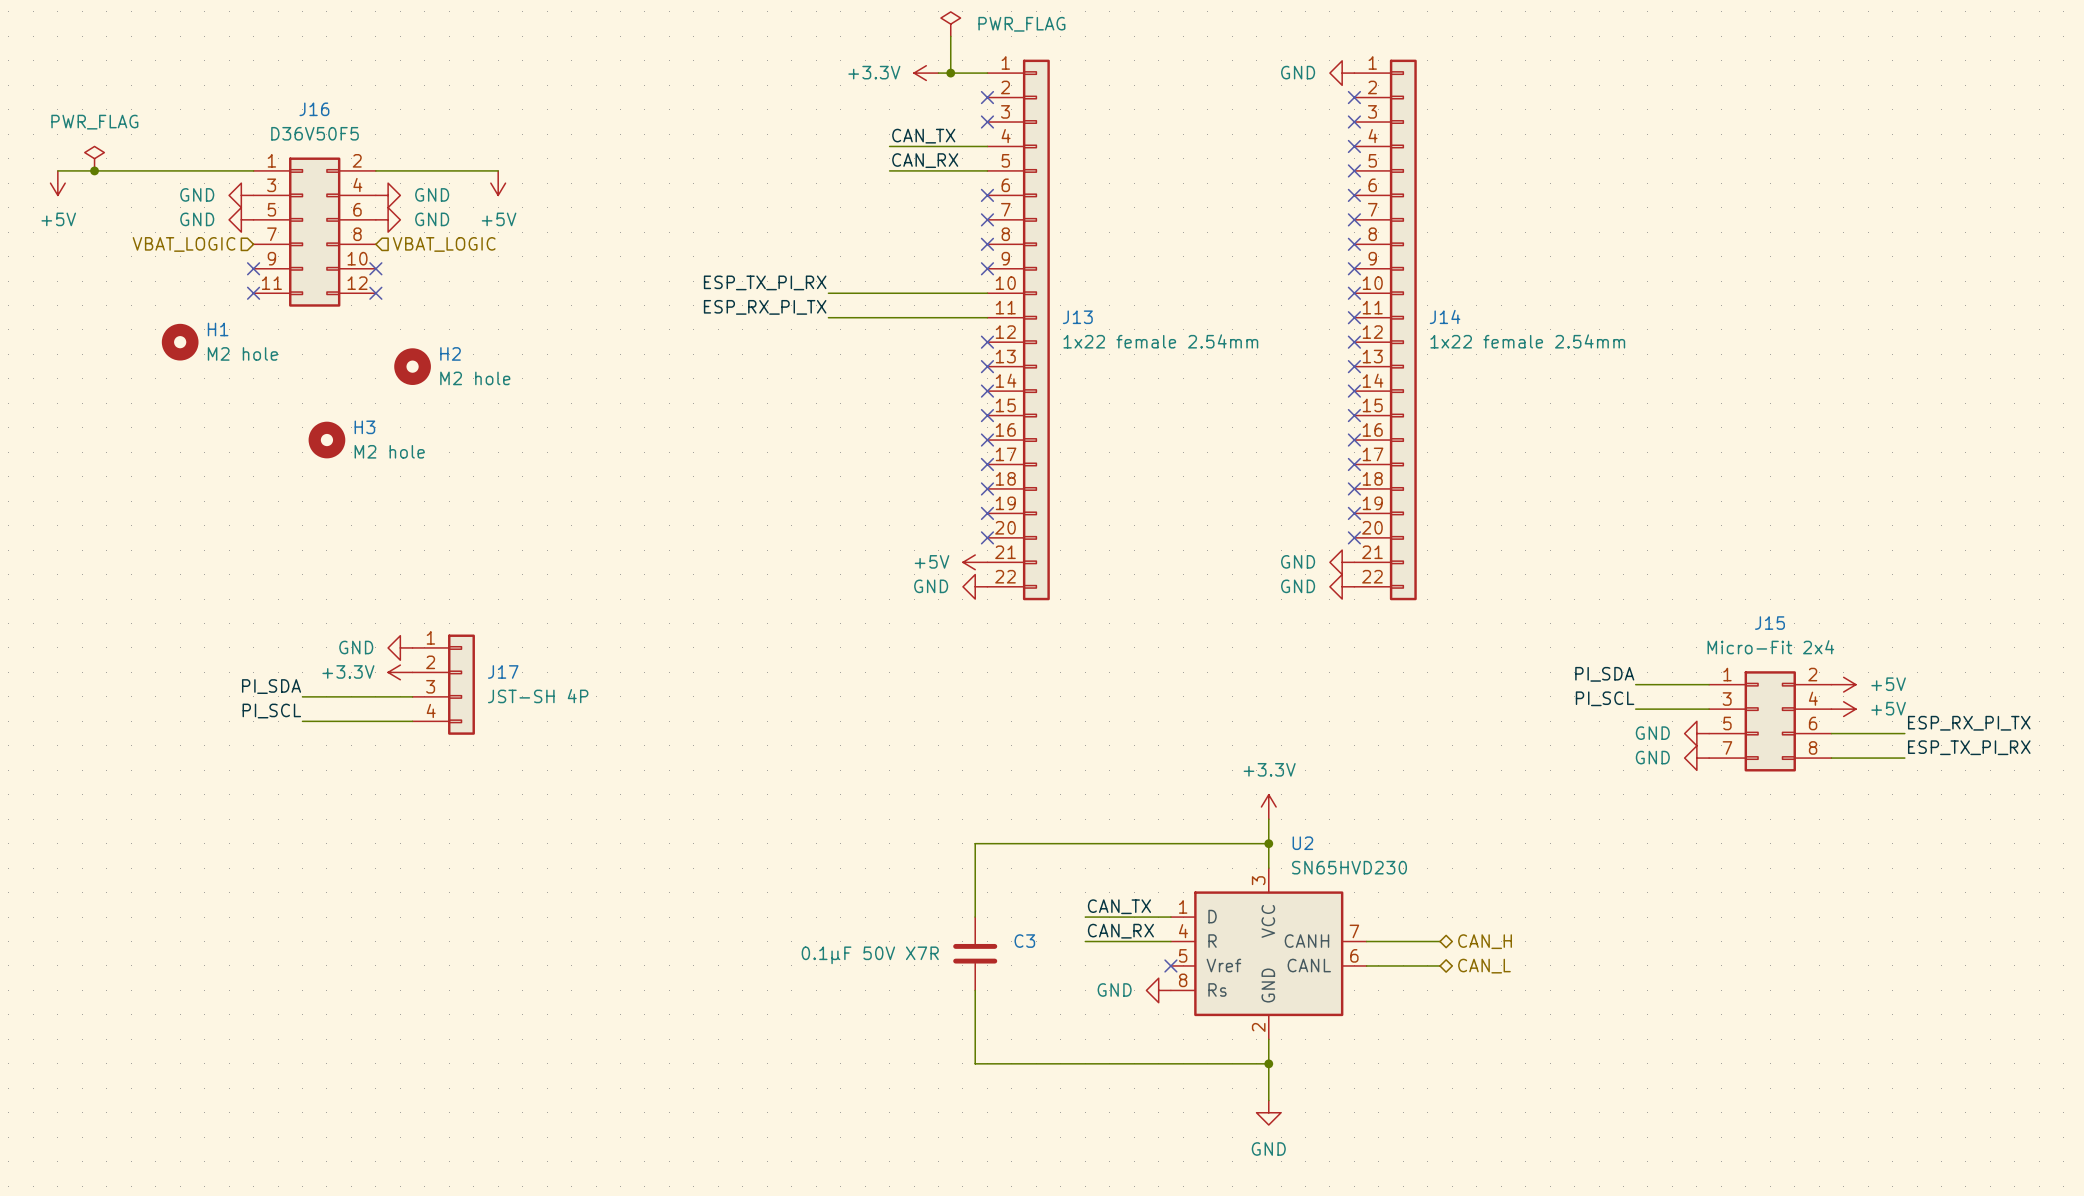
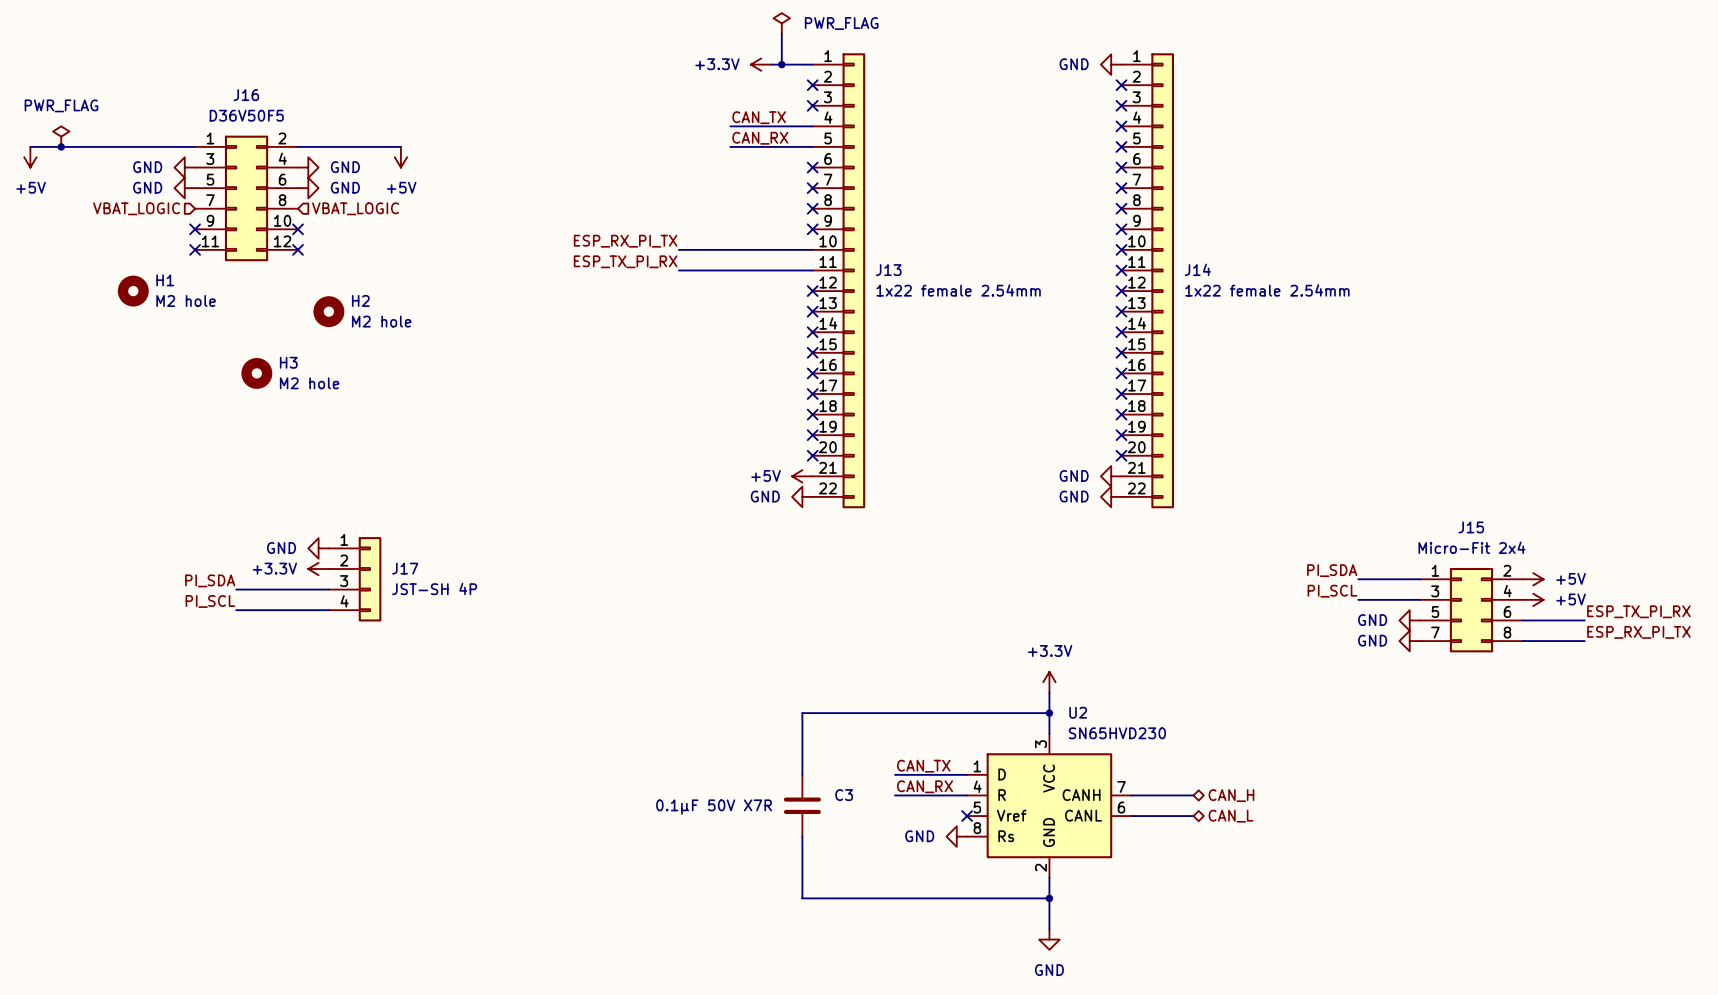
label: ESP_TX_PI_RX (765, 282) -> ESP_RX_PI_TX (625, 241)
label: ESP_RX_PI_TX (765, 307) -> ESP_TX_PI_RX (625, 261)
label: ESP_RX_PI_TX (1969, 723) -> ESP_TX_PI_RX (1638, 611)
label: ESP_TX_PI_RX (1969, 747) -> ESP_RX_PI_TX (1638, 632)

